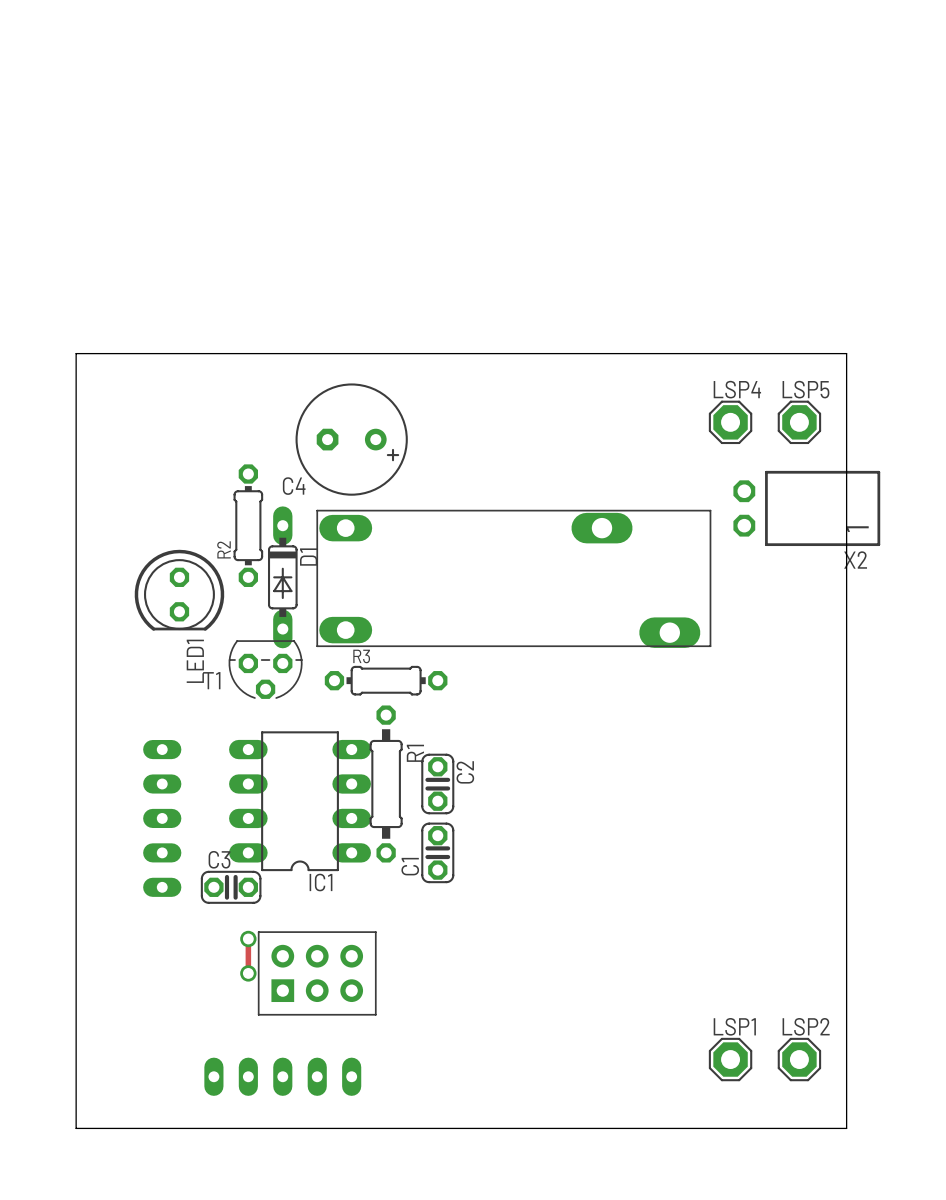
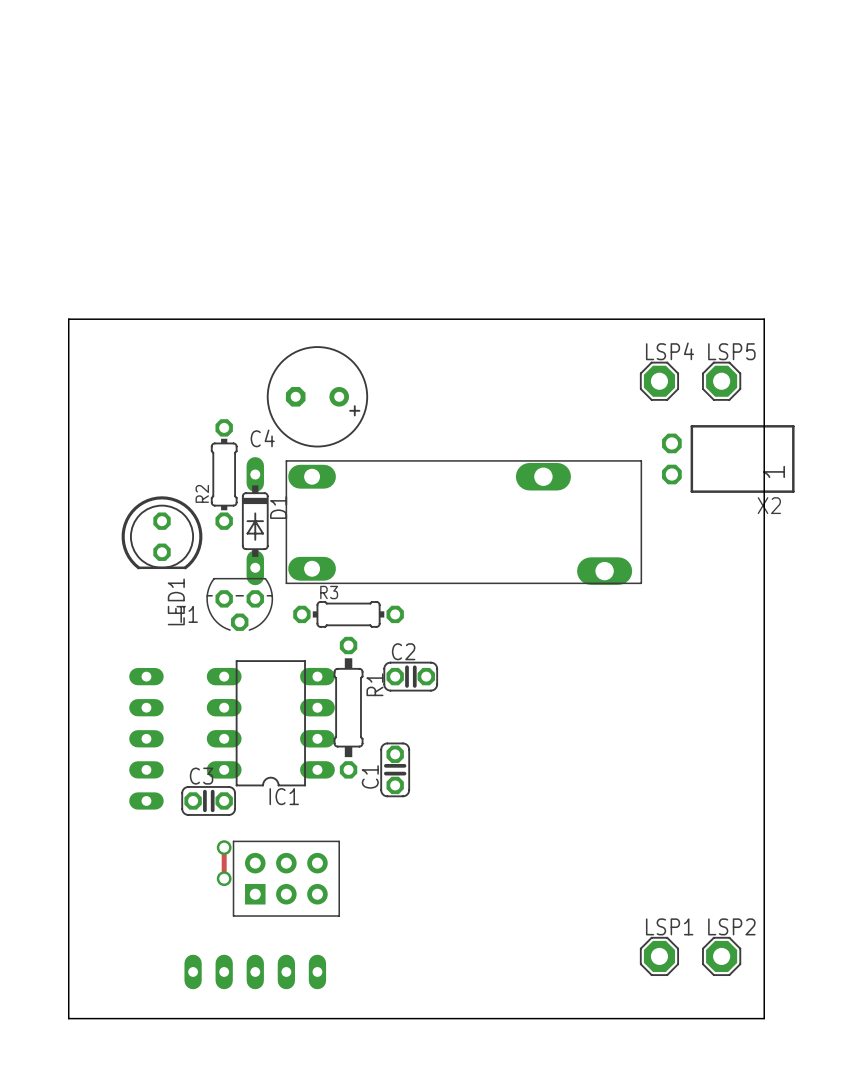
C2 rotation: 0° (437, 783) -> 90° counterclockwise (410, 676)
C2 position: (437, 783) -> (410, 676)

